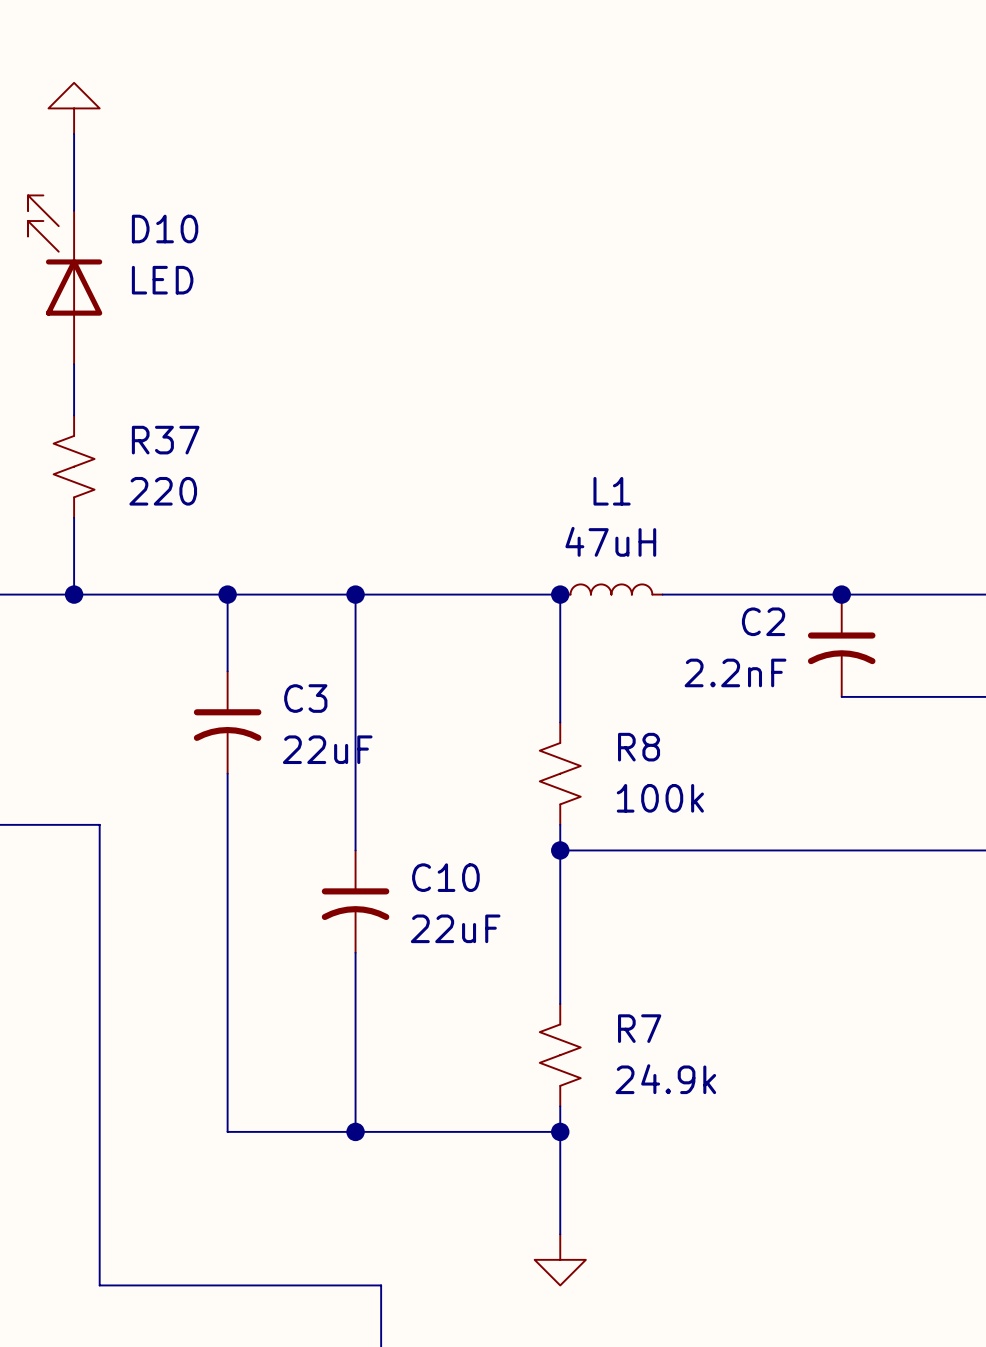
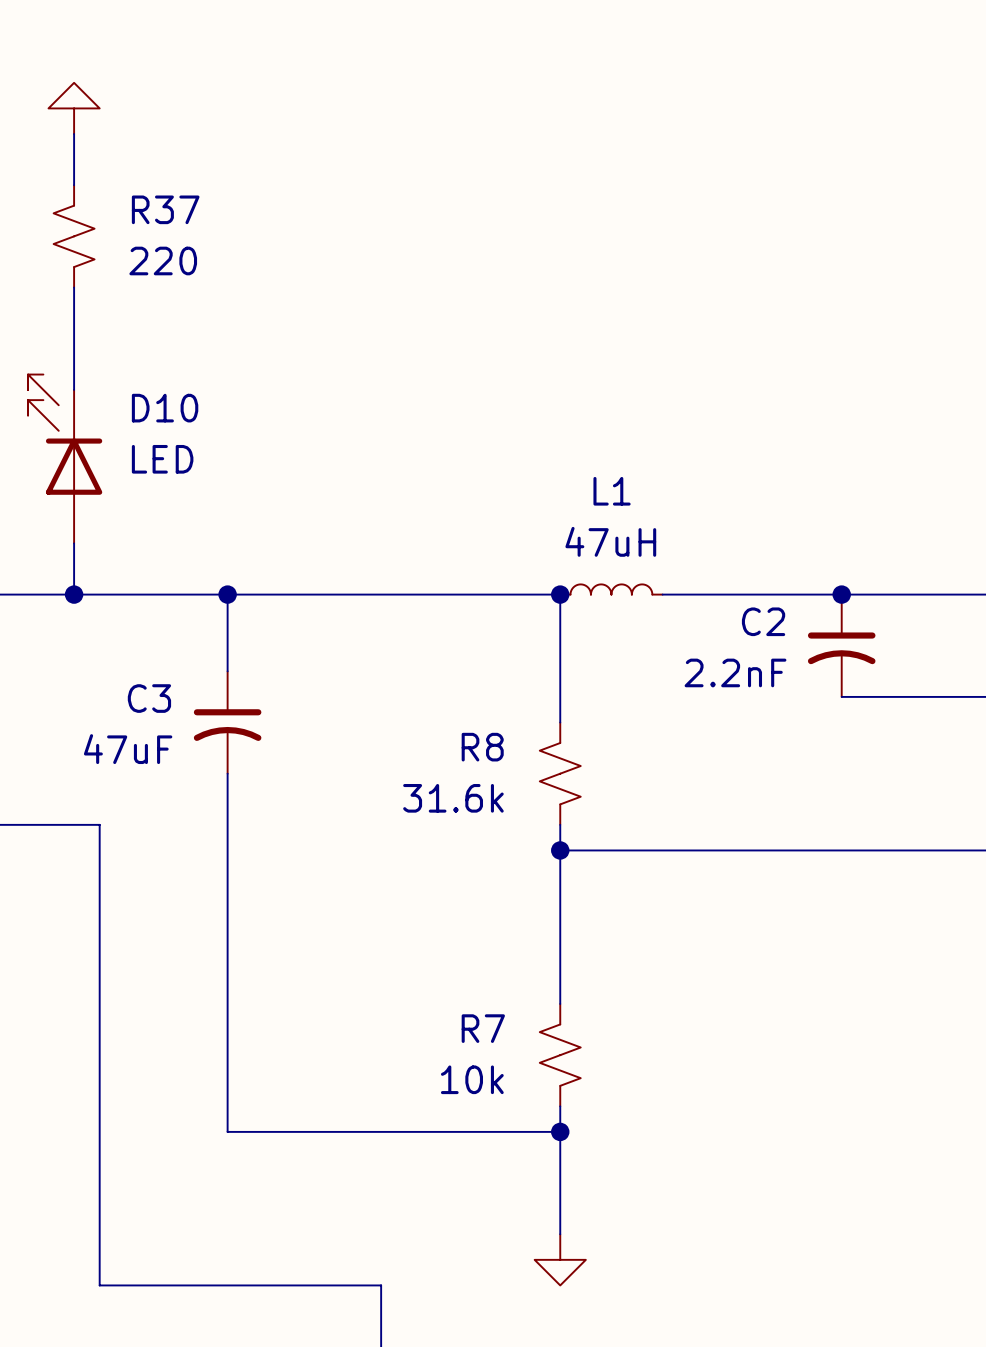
D10 position: (65, 279) -> (65, 458)
R37 position: (74, 466) -> (74, 236)
wire: (355, 594) (355, 850) -> none
junction: (355, 594) -> none
C3 name position: C3 (305, 698) -> C3 (149, 698)
R8 name position: R8 (639, 747) -> R8 (482, 747)
C3 value: 22uF (327, 749) -> 47uF (128, 749)
R8 value: 100k (660, 798) -> 31.6k (453, 798)
C10: 22uF (355, 901) -> none
wire: (355, 952) (355, 1131) -> none
R7 name position: R7 (639, 1028) -> R7 (483, 1028)
R7 value: 24.9k (665, 1079) -> 10k (472, 1079)
junction: (355, 1131) -> none

